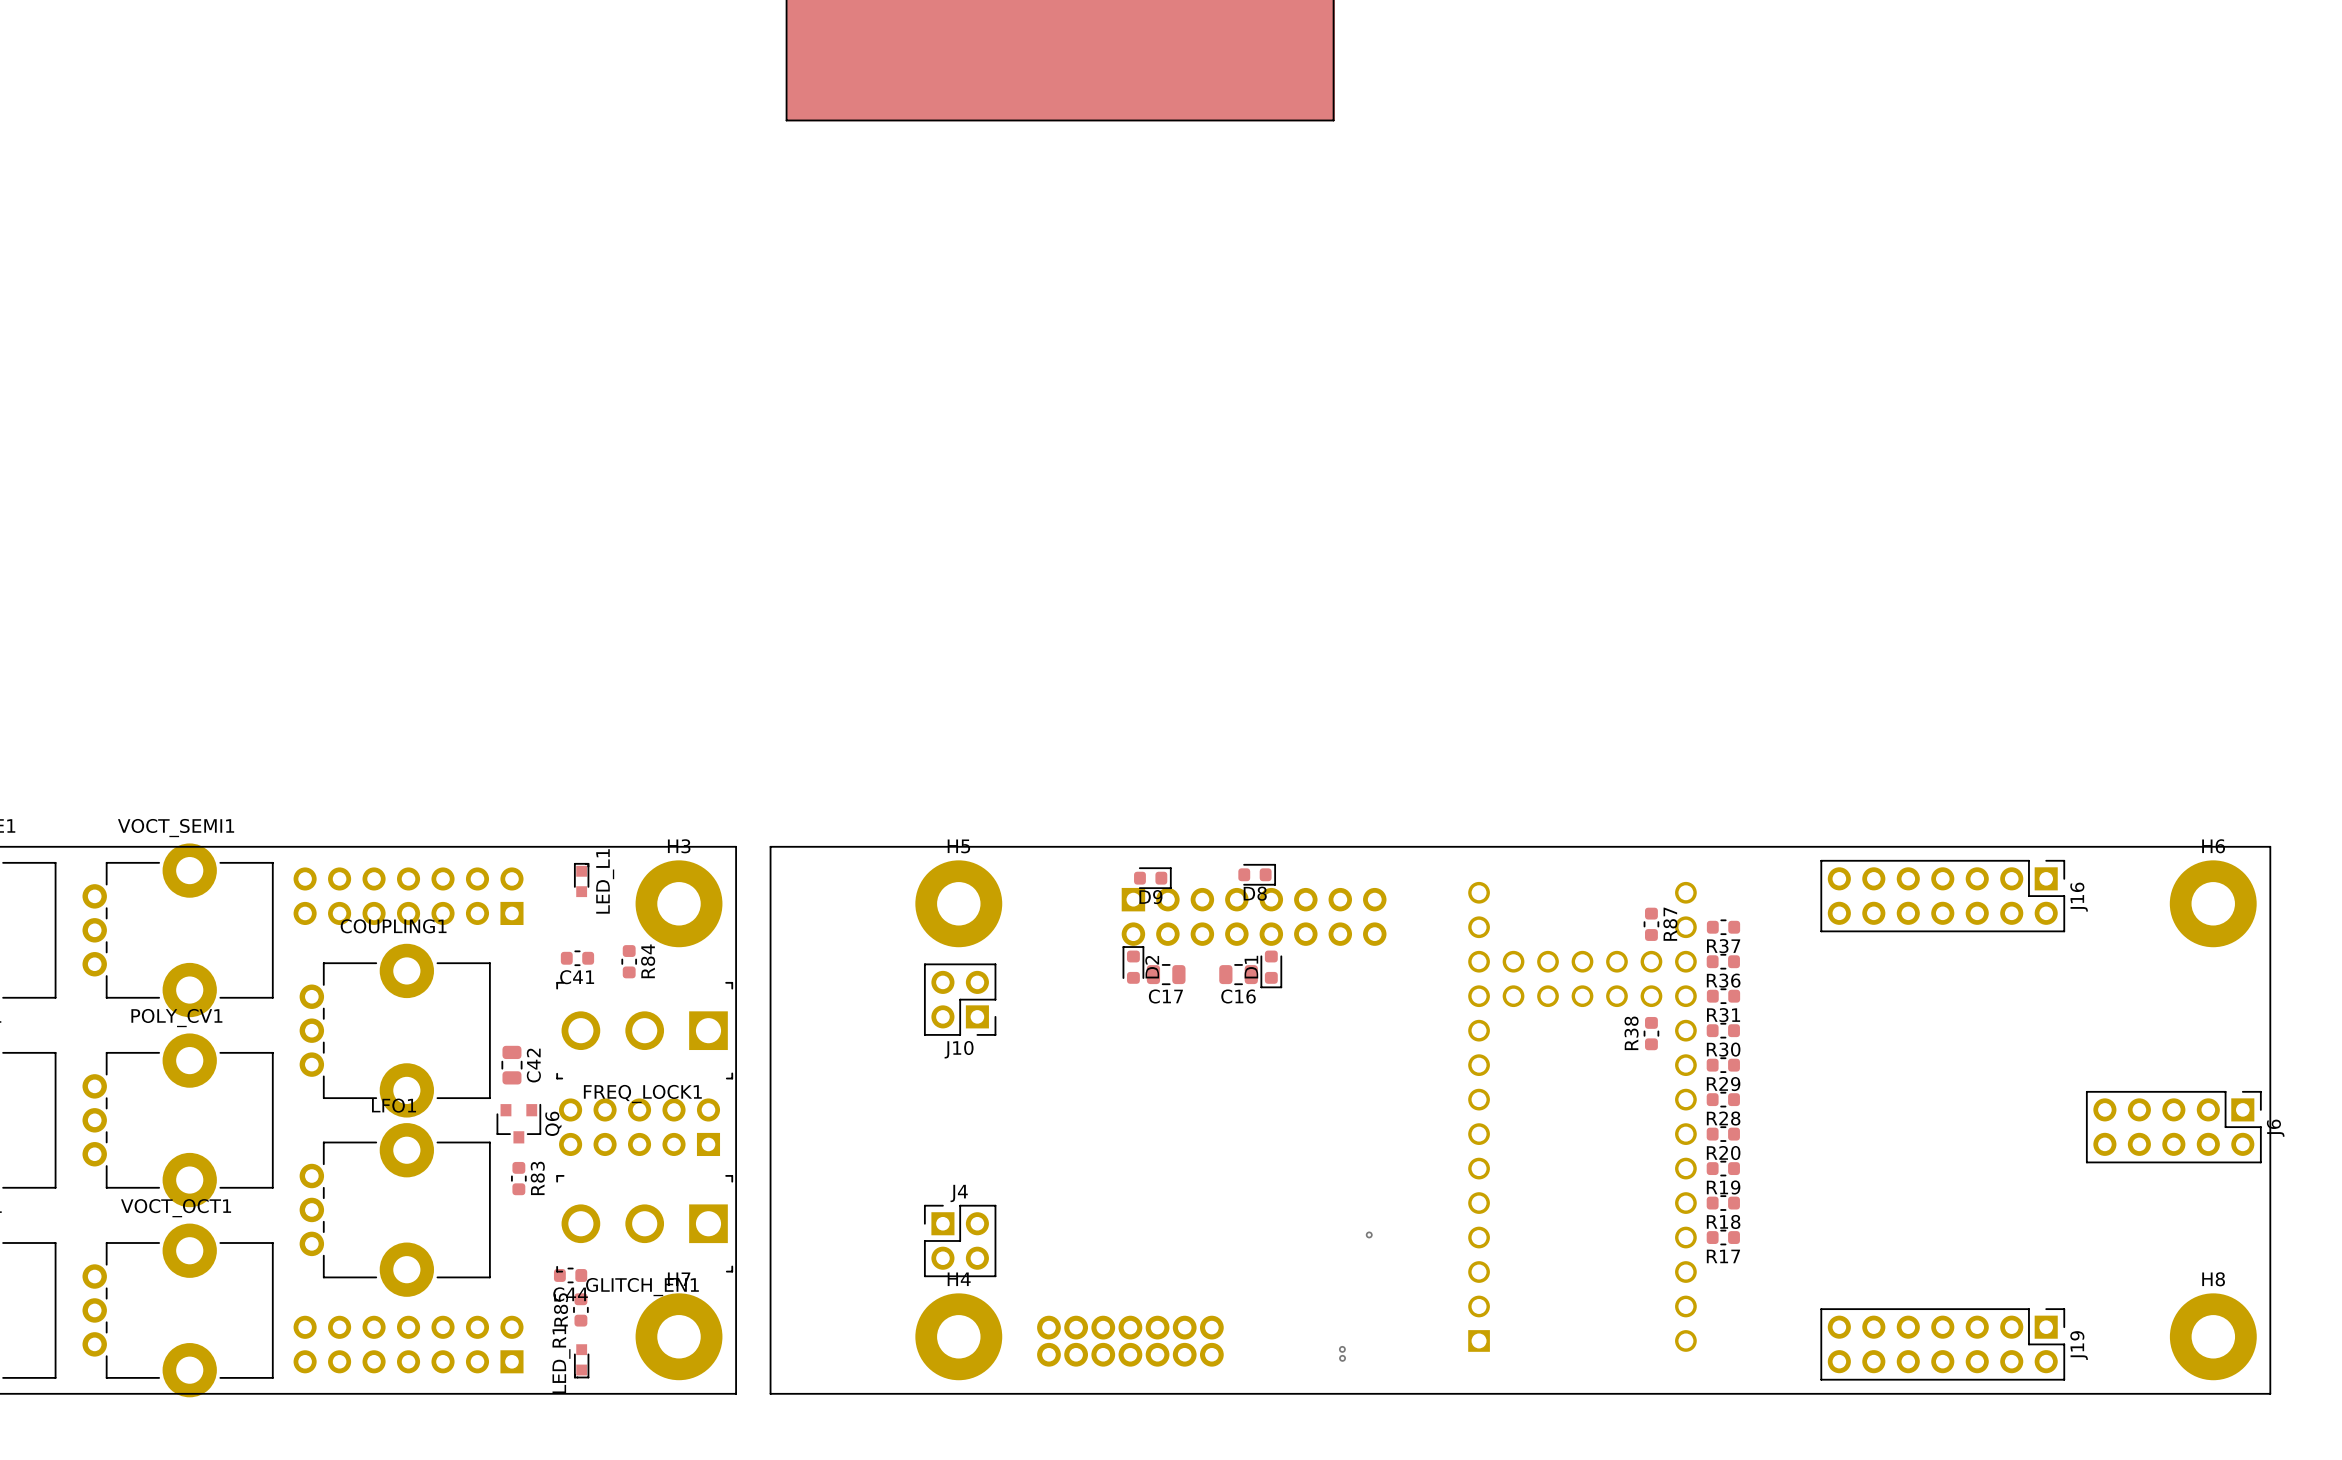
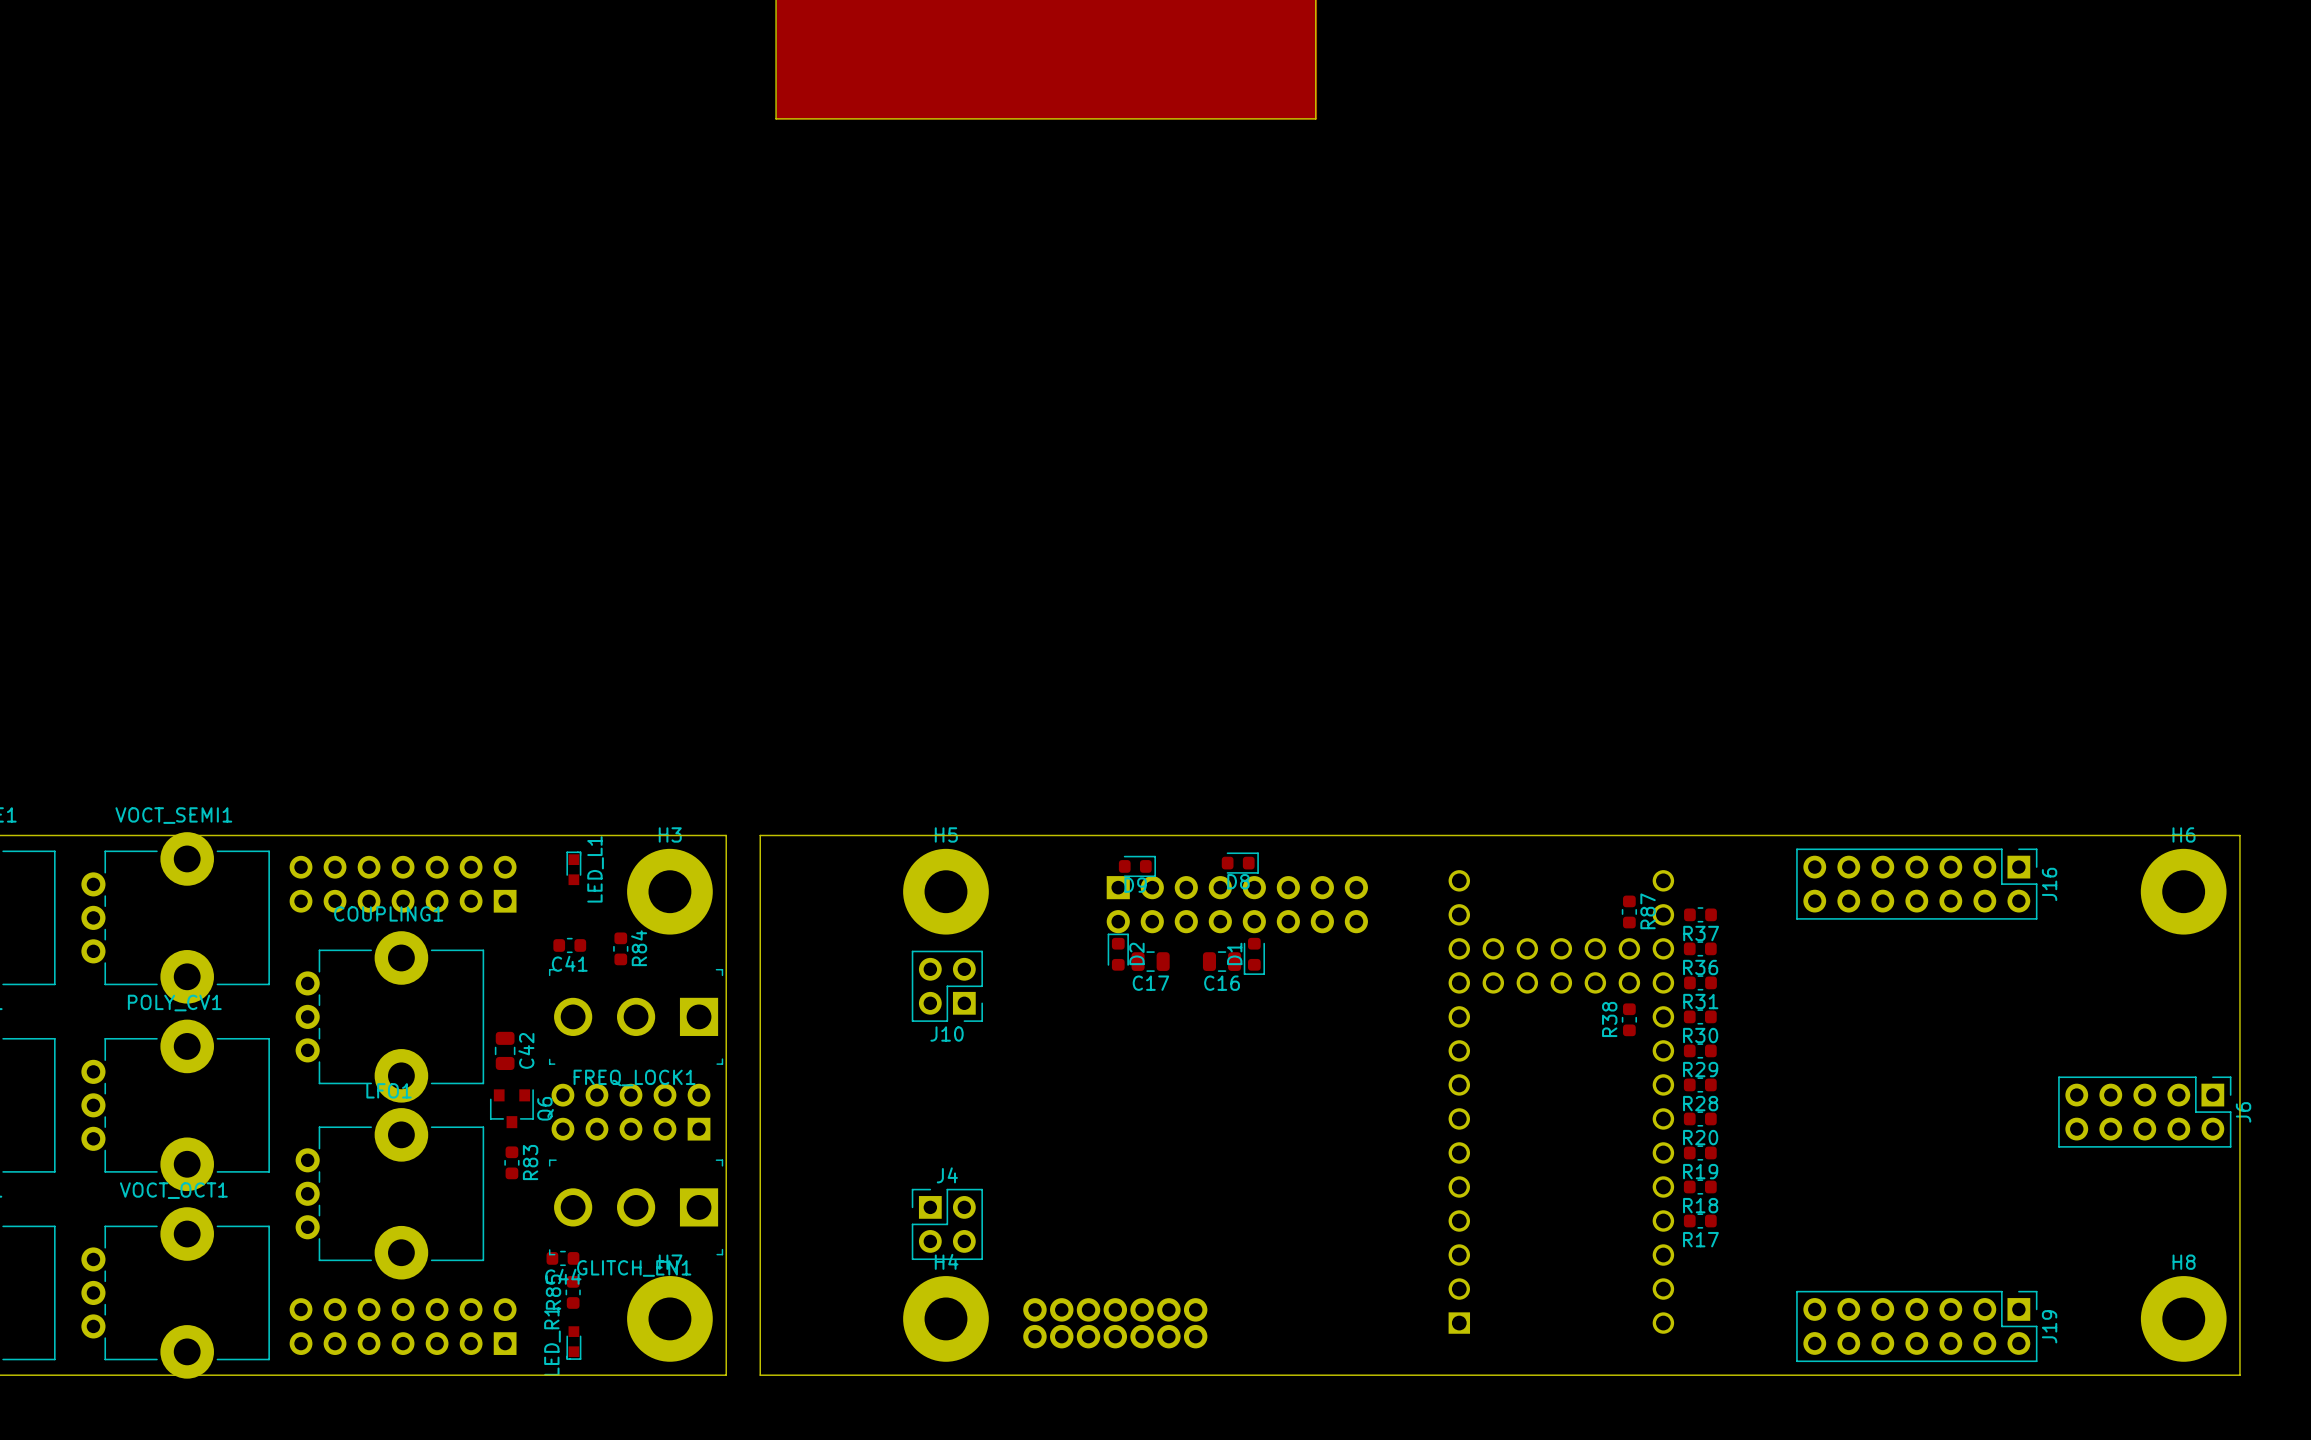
via: (1369, 1234) -> none
via: (1342, 1349) -> none
via: (1342, 1358) -> none

